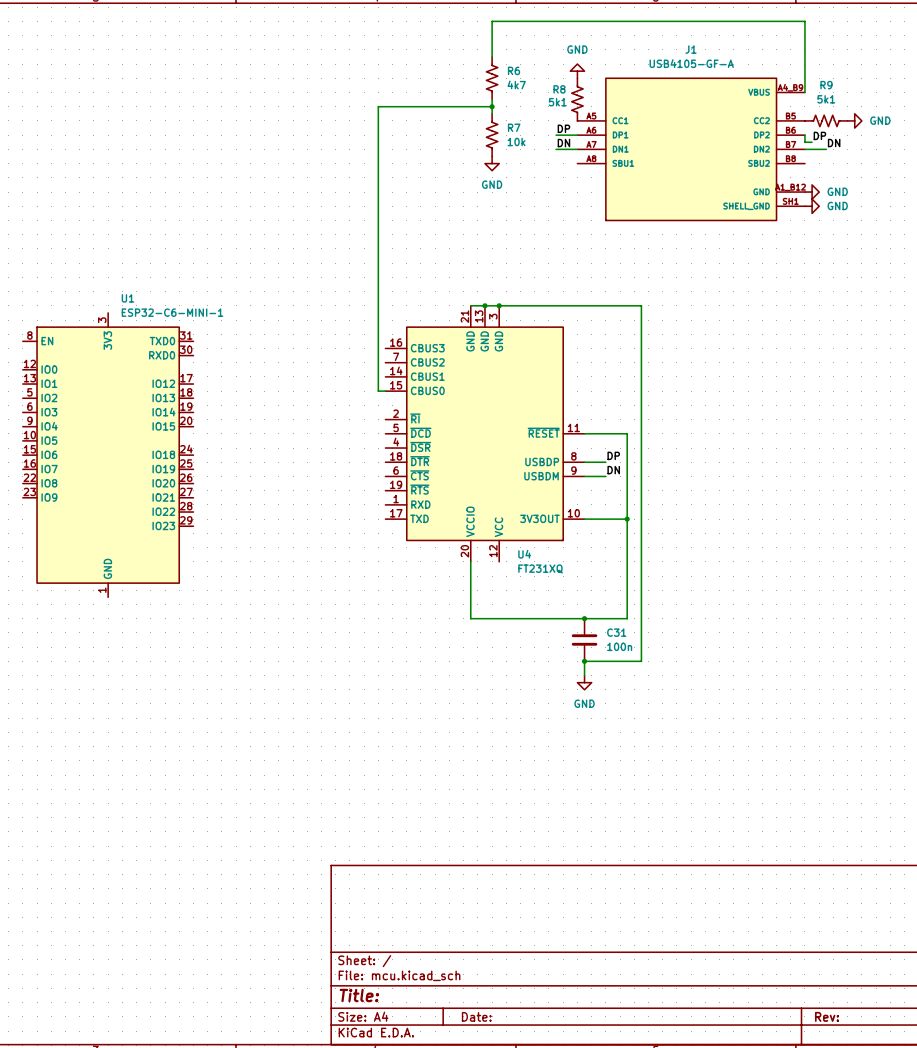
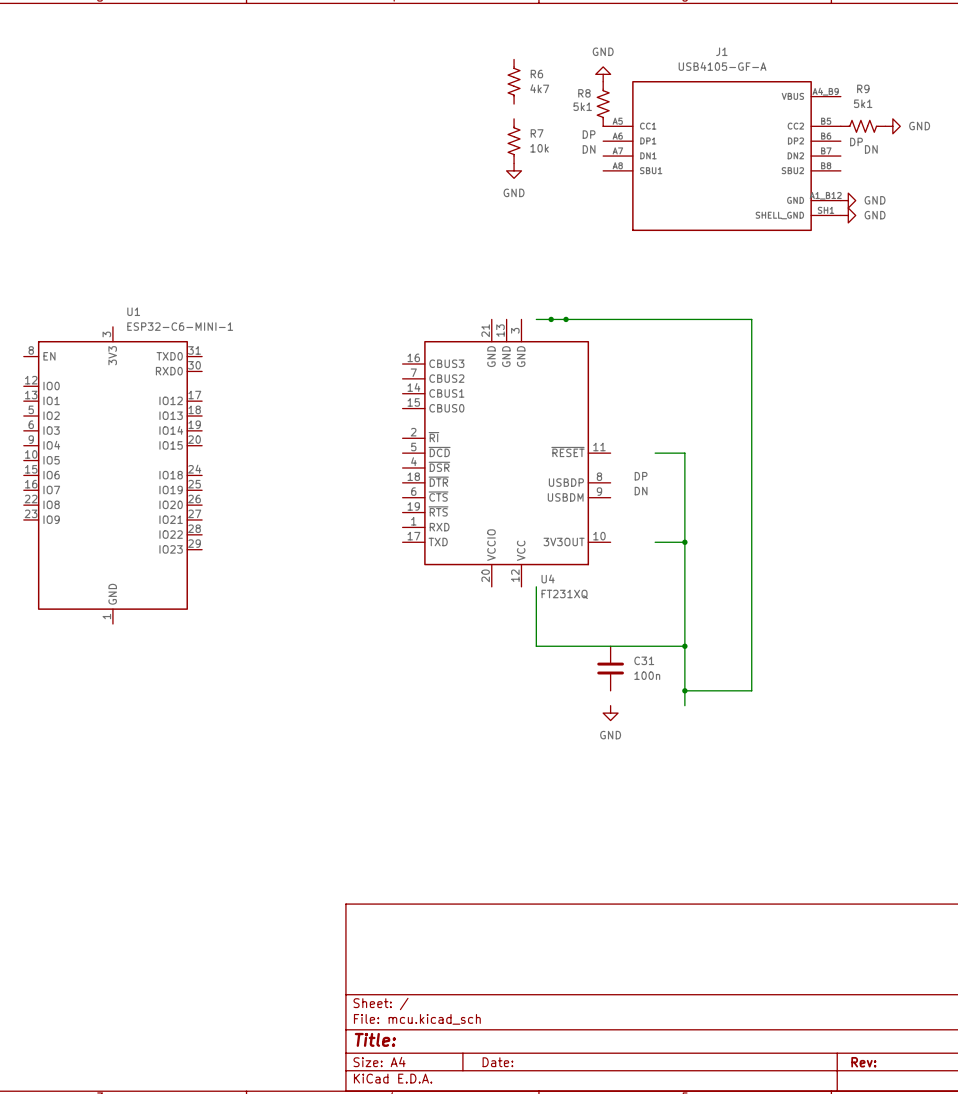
wire: (492, 56) (492, 21) (804, 21) (804, 92) -> none
wire: (492, 99) (492, 113) -> none
wire: (492, 106) (378, 106) (378, 391) (385, 391) -> none
junction: (492, 106) -> none
wire: (556, 135) (577, 135) -> none
wire: (804, 135) (804, 142) (812, 142) -> none
wire: (556, 149) (577, 149) -> none
wire: (804, 149) (826, 149) -> none
wire: (470, 305) (513, 305) -> none
junction: (484, 305) -> none
junction: (499, 305) -> none
junction: none -> (551, 319)
junction: none -> (566, 319)
wire: (641, 305) (641, 661) (584, 661) (584, 675) -> (670, 319) (751, 319) (751, 690) (684, 690)
wire: (584, 433) (627, 433) (627, 618) -> (684, 646) (655, 646)
wire: none -> (655, 453) (684, 453) (684, 705)
wire: (584, 462) (605, 462) -> none
wire: (584, 476) (605, 476) -> none
wire: (584, 519) (627, 519) -> (684, 542) (655, 542)
junction position: (627, 519) -> (684, 542)
wire: (470, 561) (470, 618) (513, 618) -> (536, 586) (536, 646)
junction: (584, 618) -> none
junction: none -> (684, 646)
junction: (584, 661) -> none
junction: none -> (684, 690)

